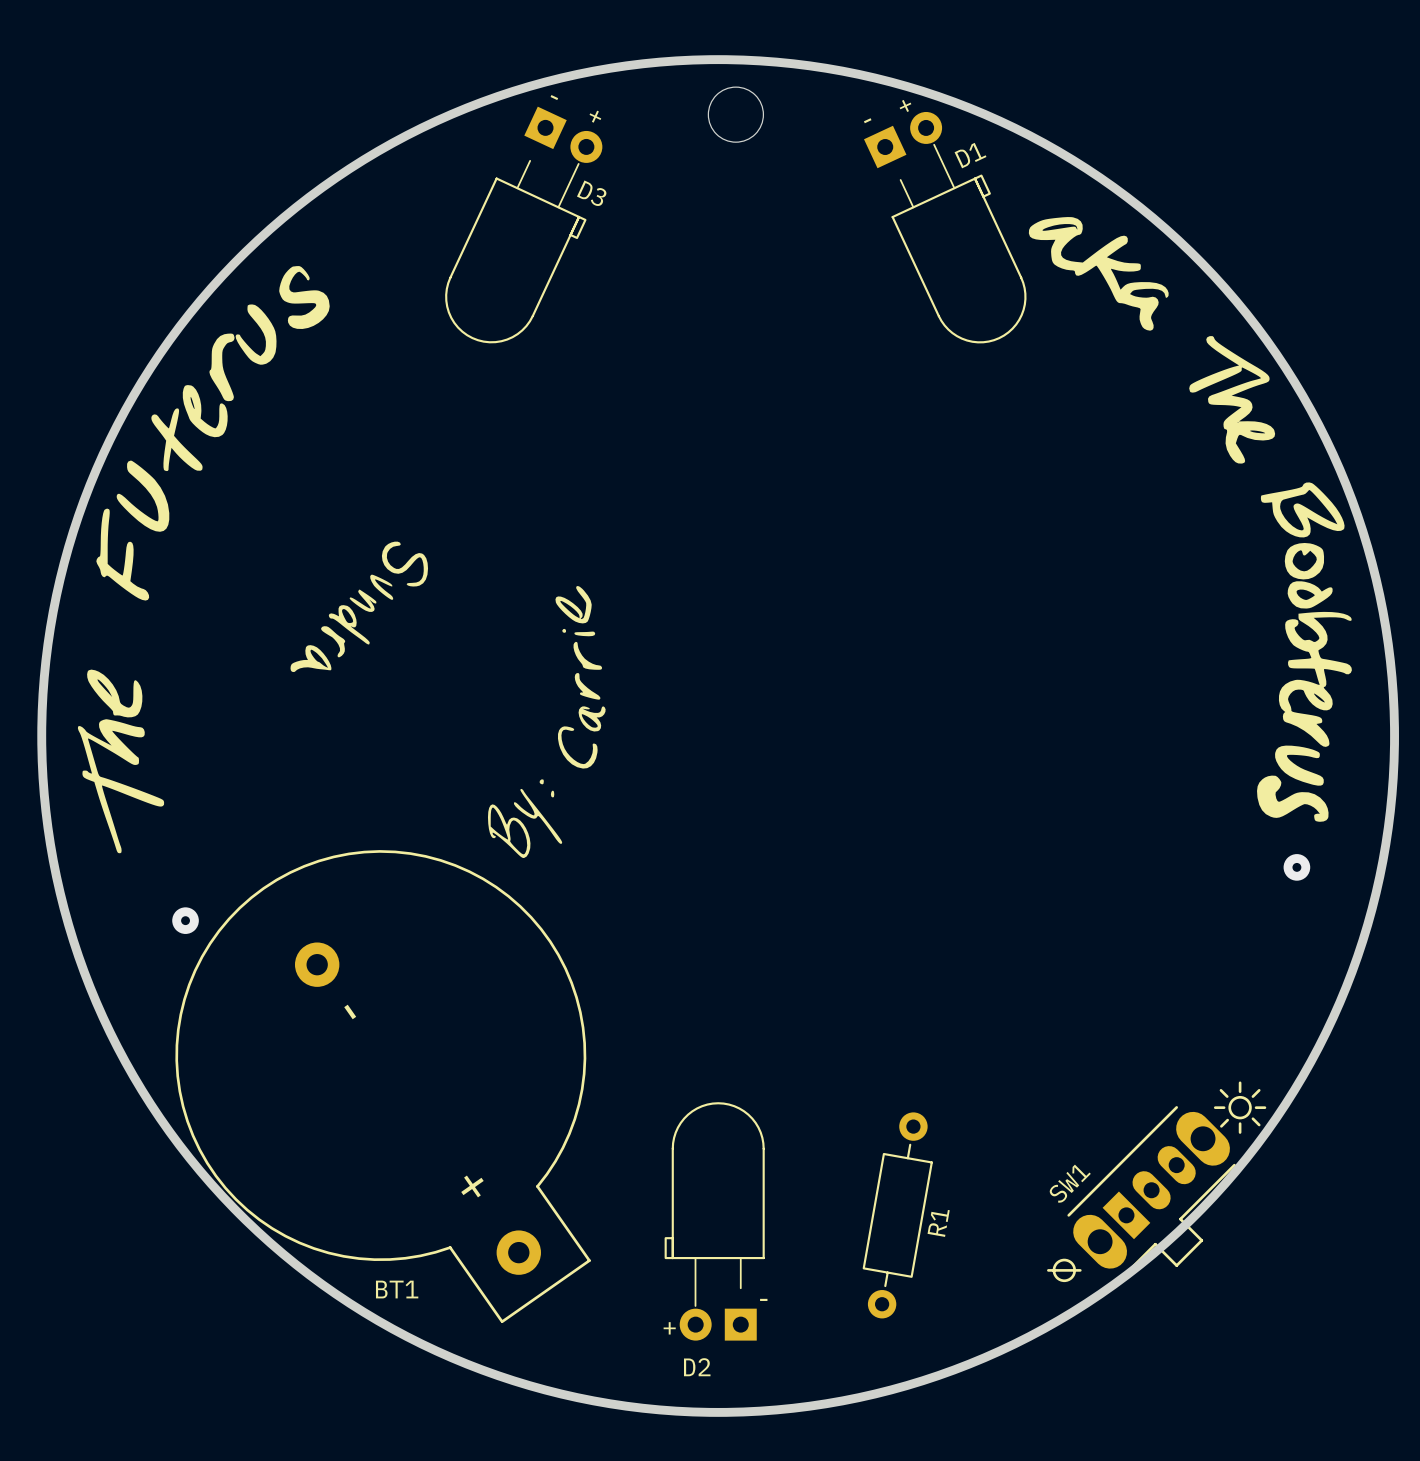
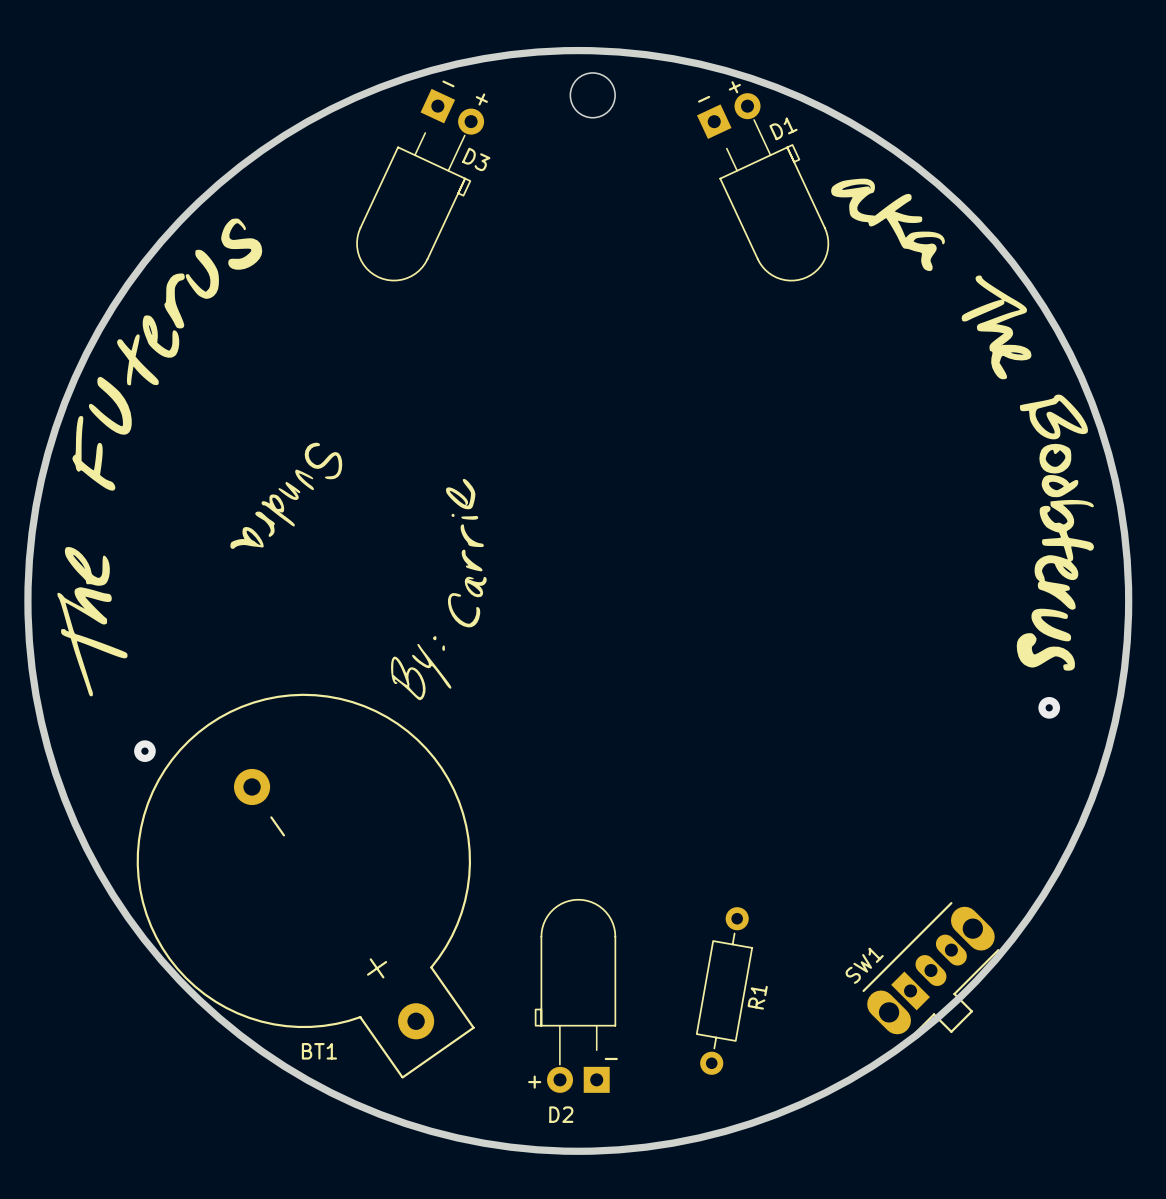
line: (1240, 1082) (1240, 1091) -> none
line: (1220, 1090) (1227, 1096) -> none
line: (1259, 1090) (1252, 1096) -> none
drawing: [1228, 1095, 1252, 1120] -> none
line: (1224, 1107) (1215, 1107) -> none
line: (1264, 1107) (1256, 1107) -> none
line: (1252, 1118) (1259, 1125) -> none
line: (1227, 1120) (1221, 1126) -> none
line: (1240, 1123) (1240, 1132) -> none
drawing: [1052, 1258, 1077, 1283] -> none
line: (1080, 1270) (1048, 1270) -> none

